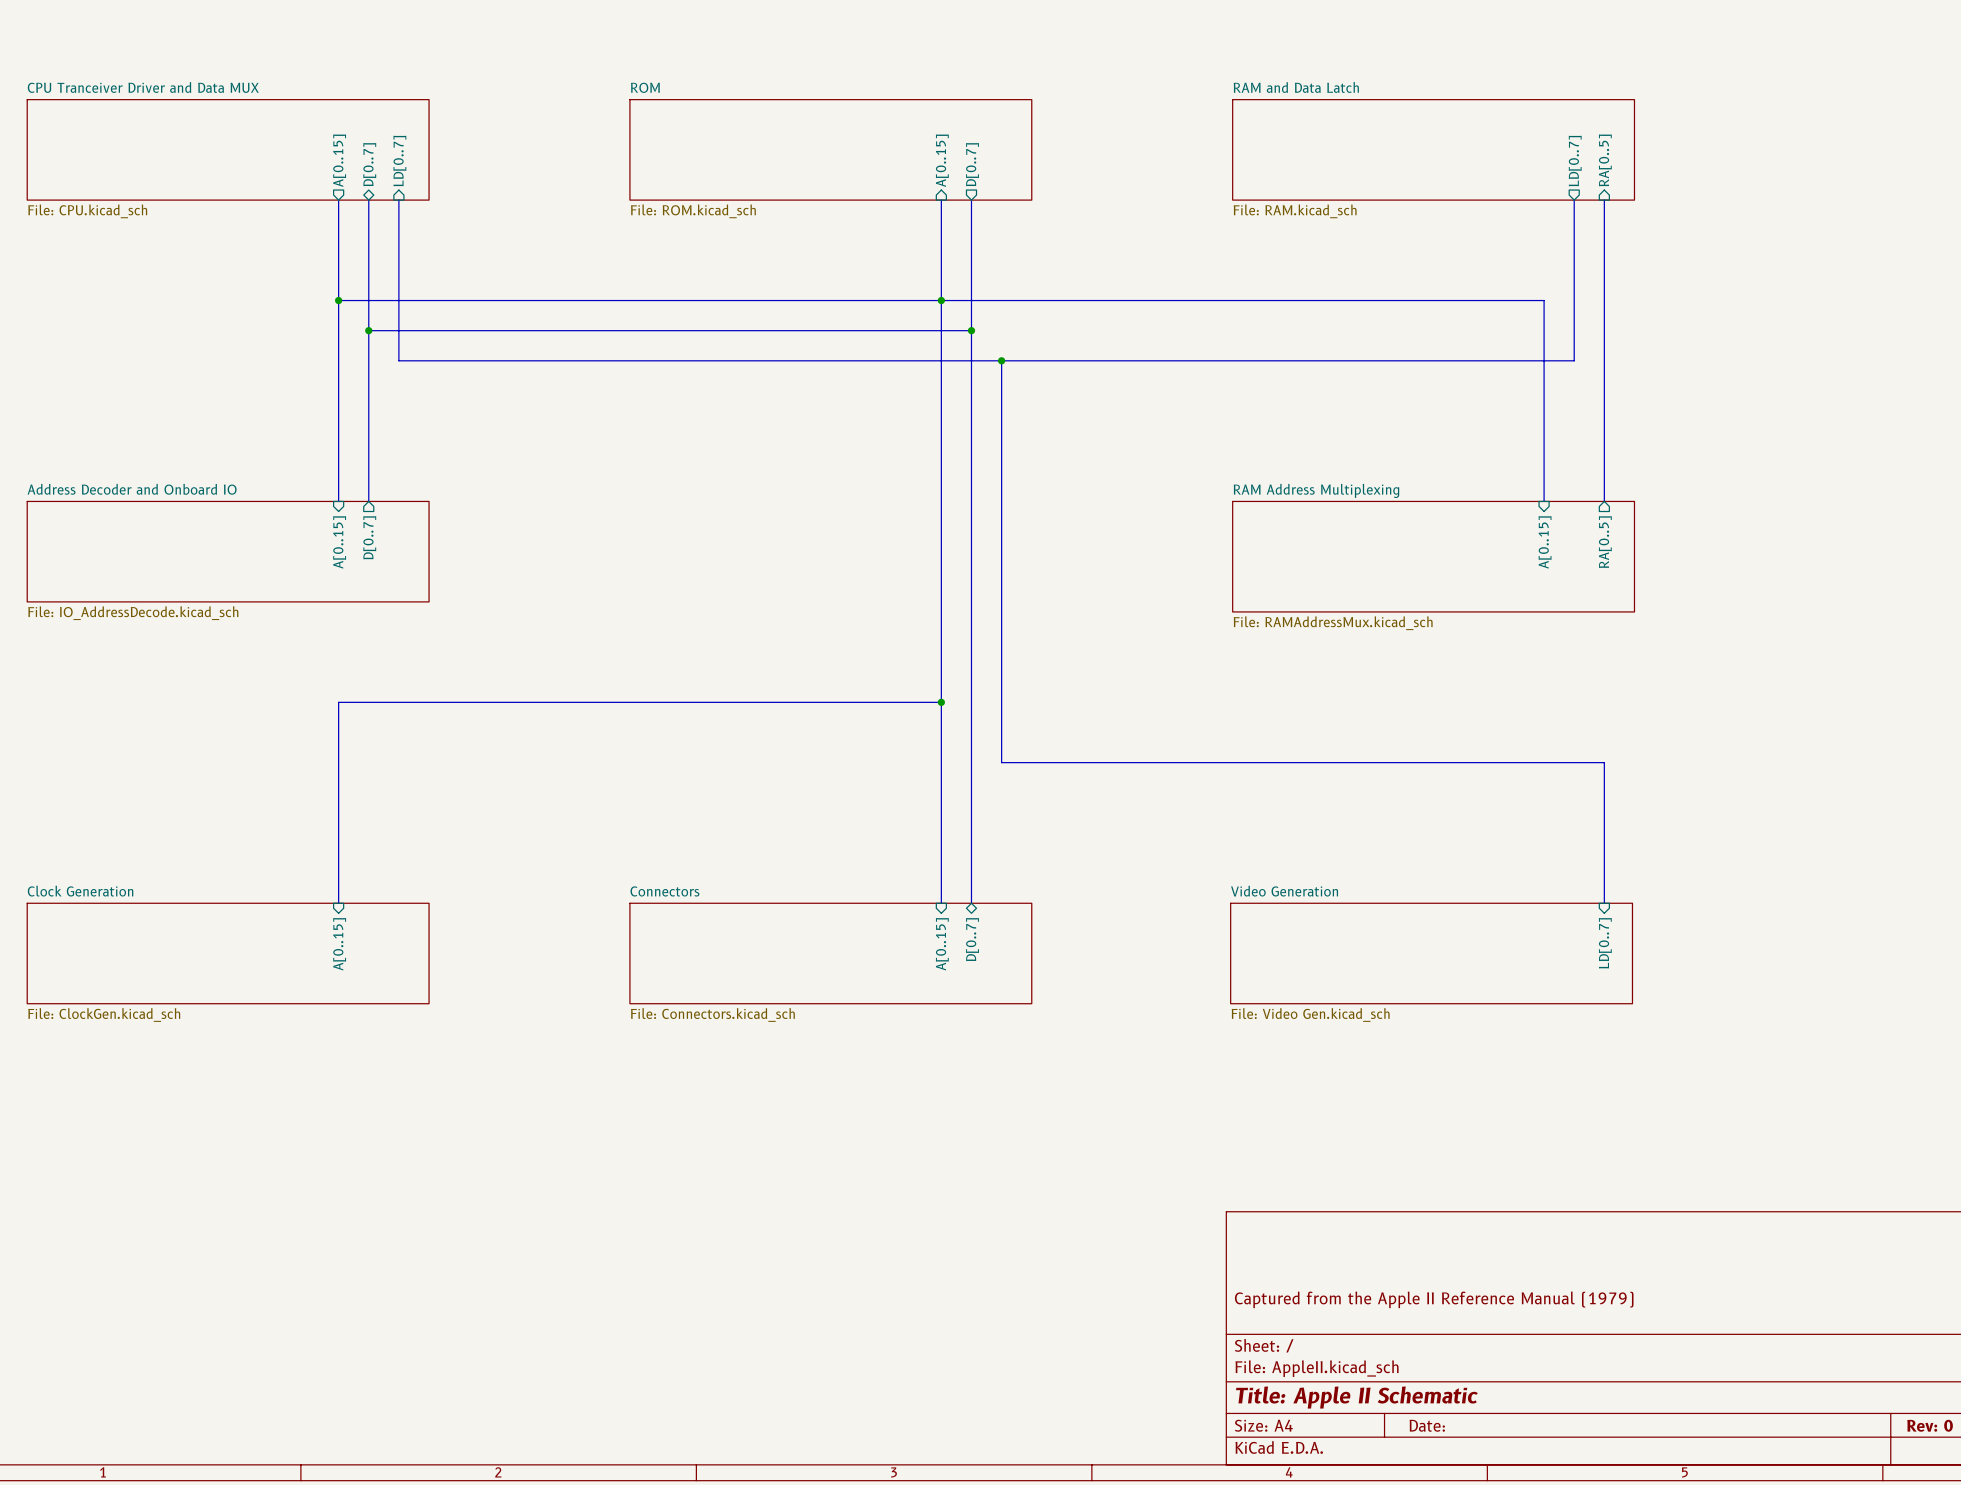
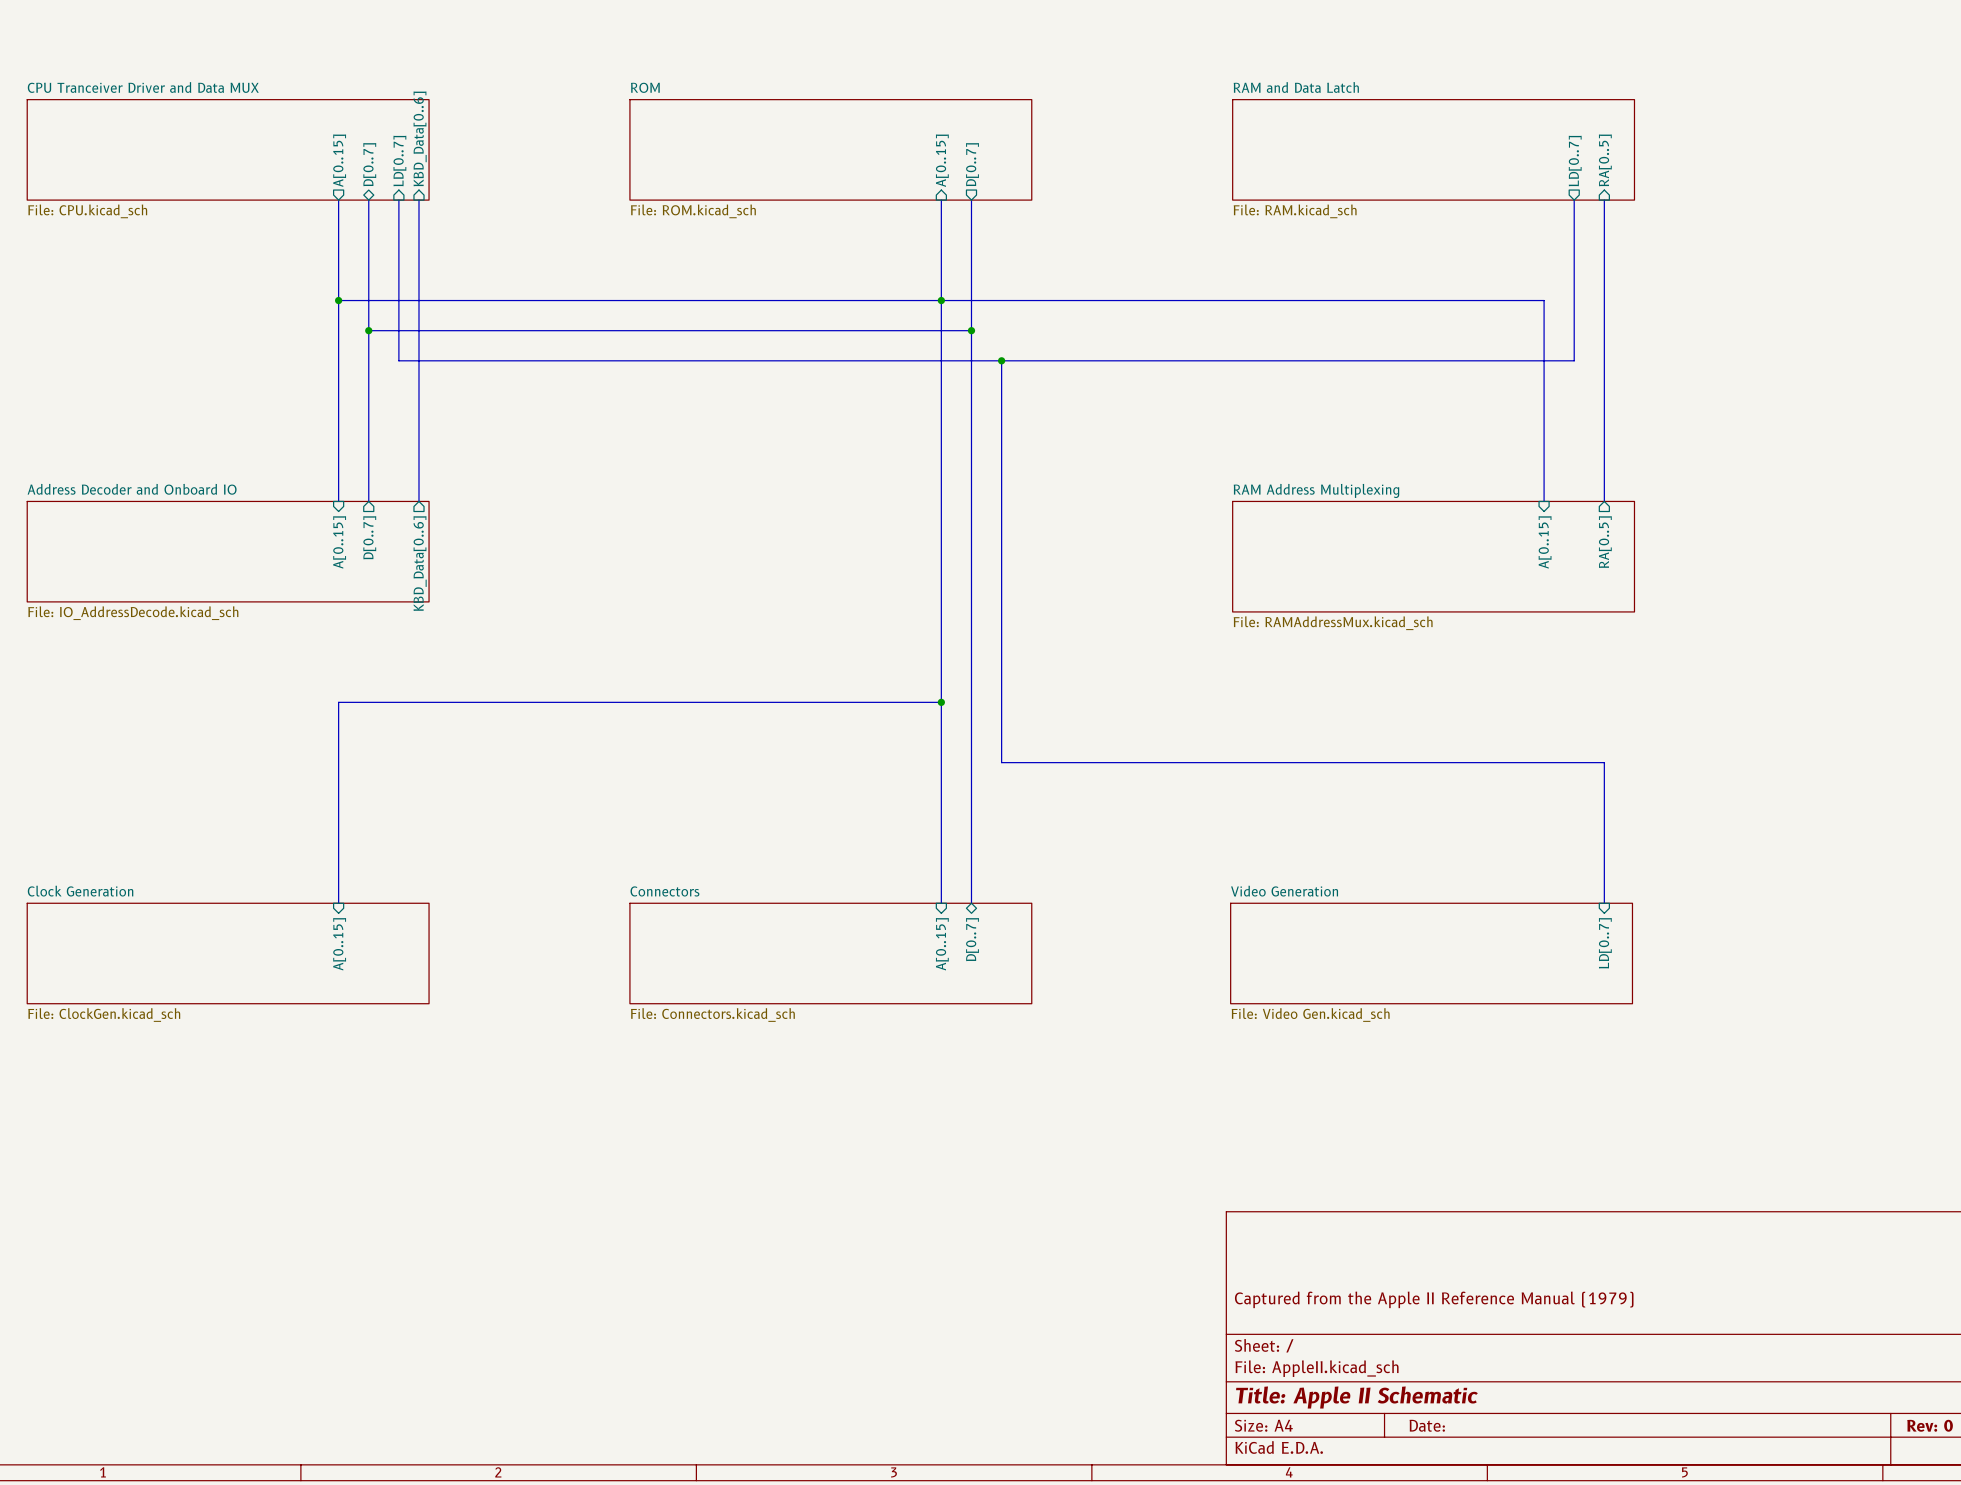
sheet pin: none -> KBD_Data[0..6] (420, 138)
bus: none -> (418, 200) (418, 501)
sheet pin: none -> KBD_Data[0..6] (420, 563)

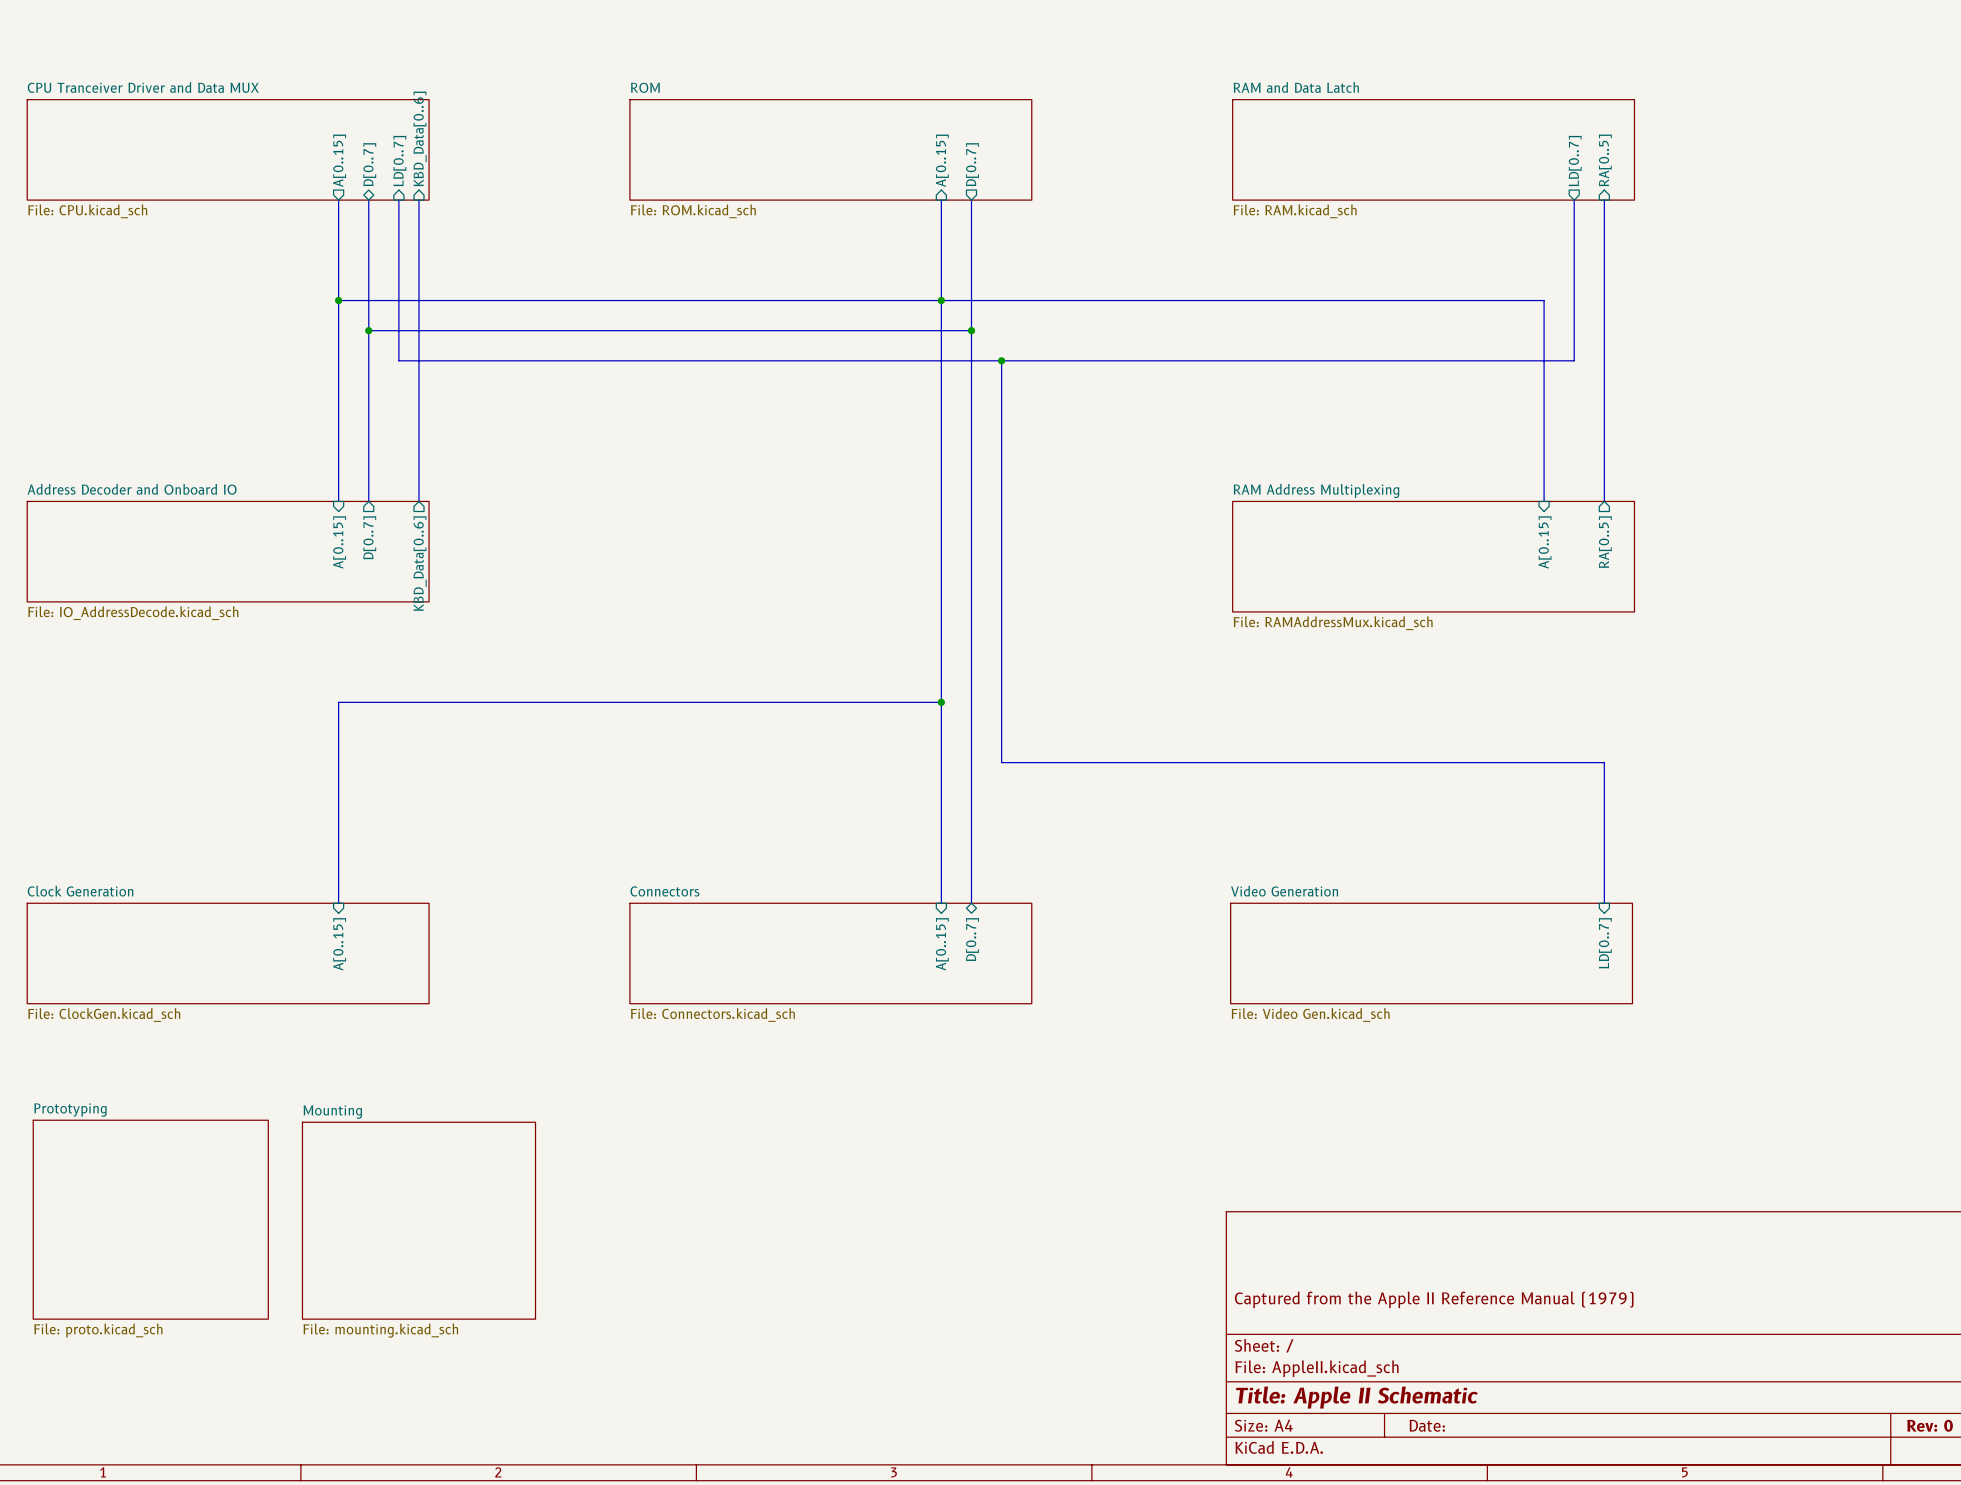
sheet Prototyping: none -> File: proto.kicad_sch (150, 1219)
sheet Mounting: none -> File: mounting.kicad_sch (418, 1220)

